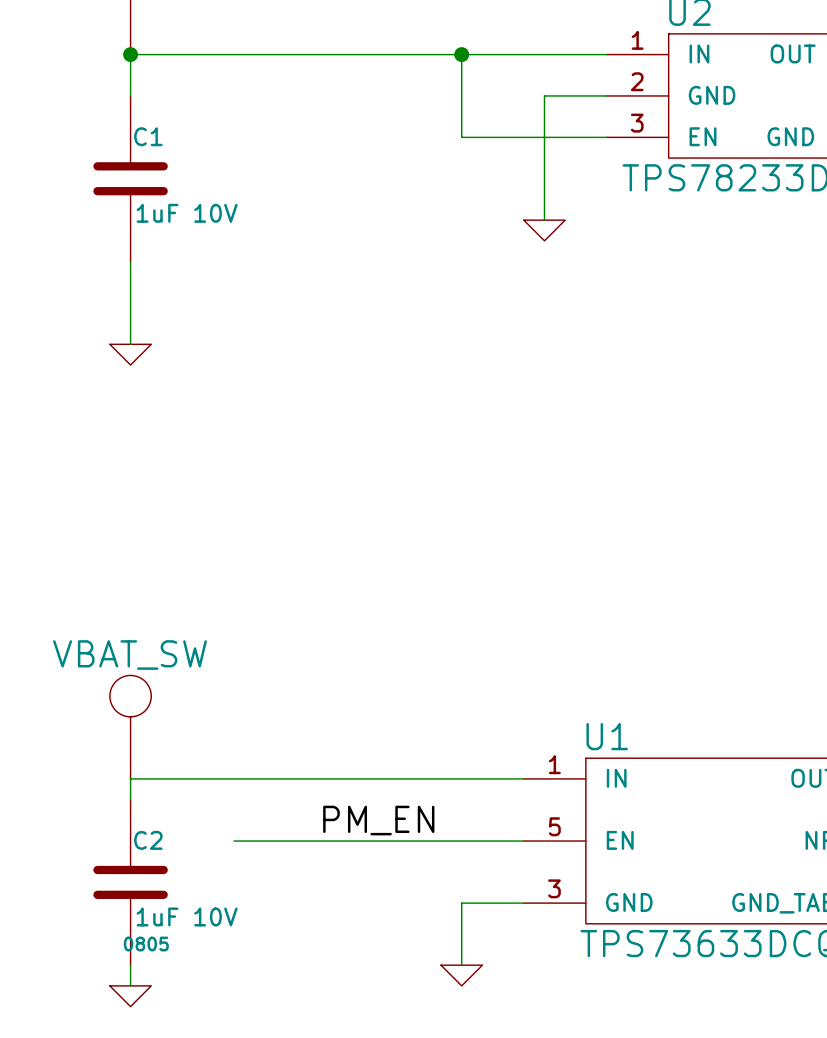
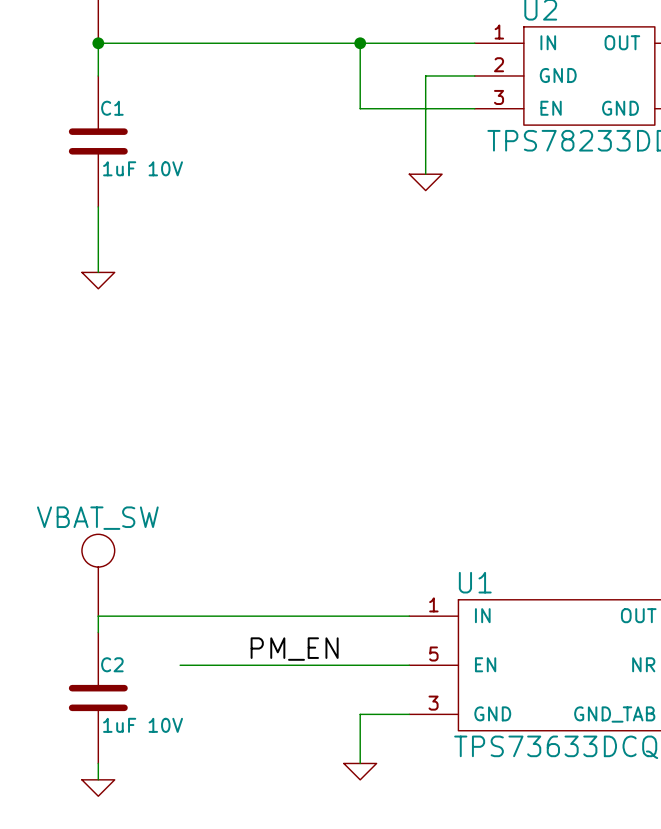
C2 text: 0805 (146, 944) -> none

